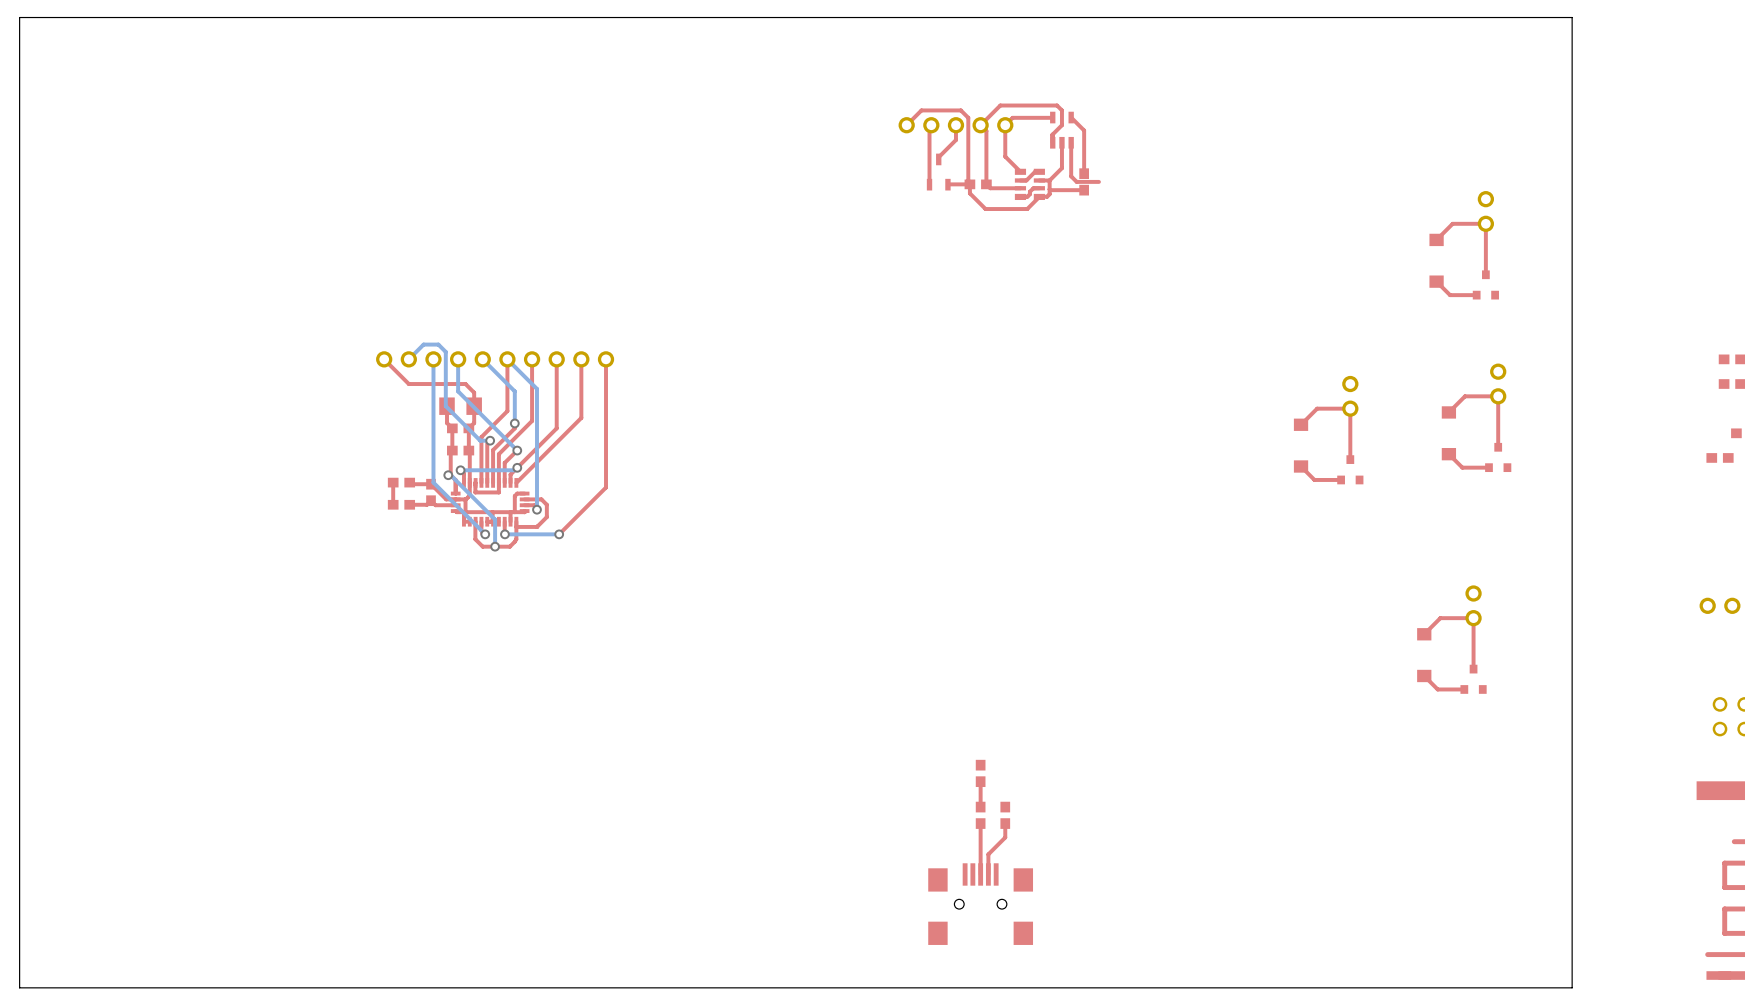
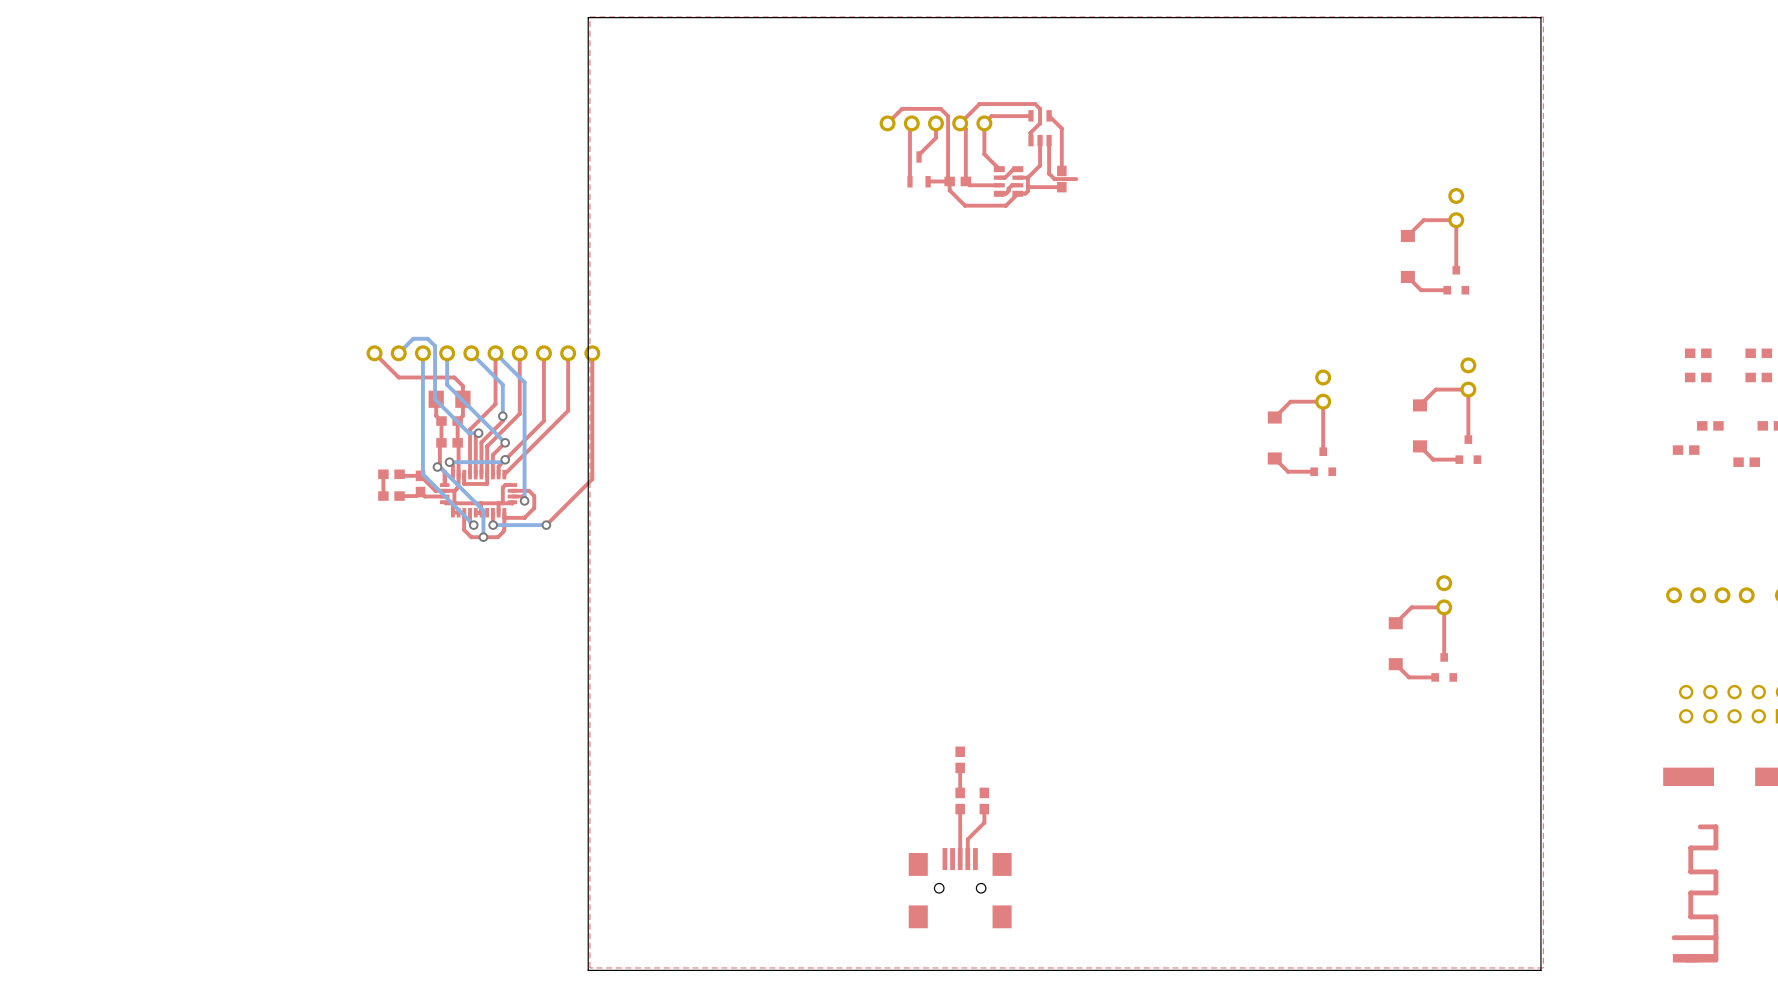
top zone outline: none -> (1543, 16) (589, 16) (589, 967) (1543, 967) (1543, 16)
board edge: (601, 17) (19, 17) (19, 987) (601, 987) -> (588, 17) (588, 970)

